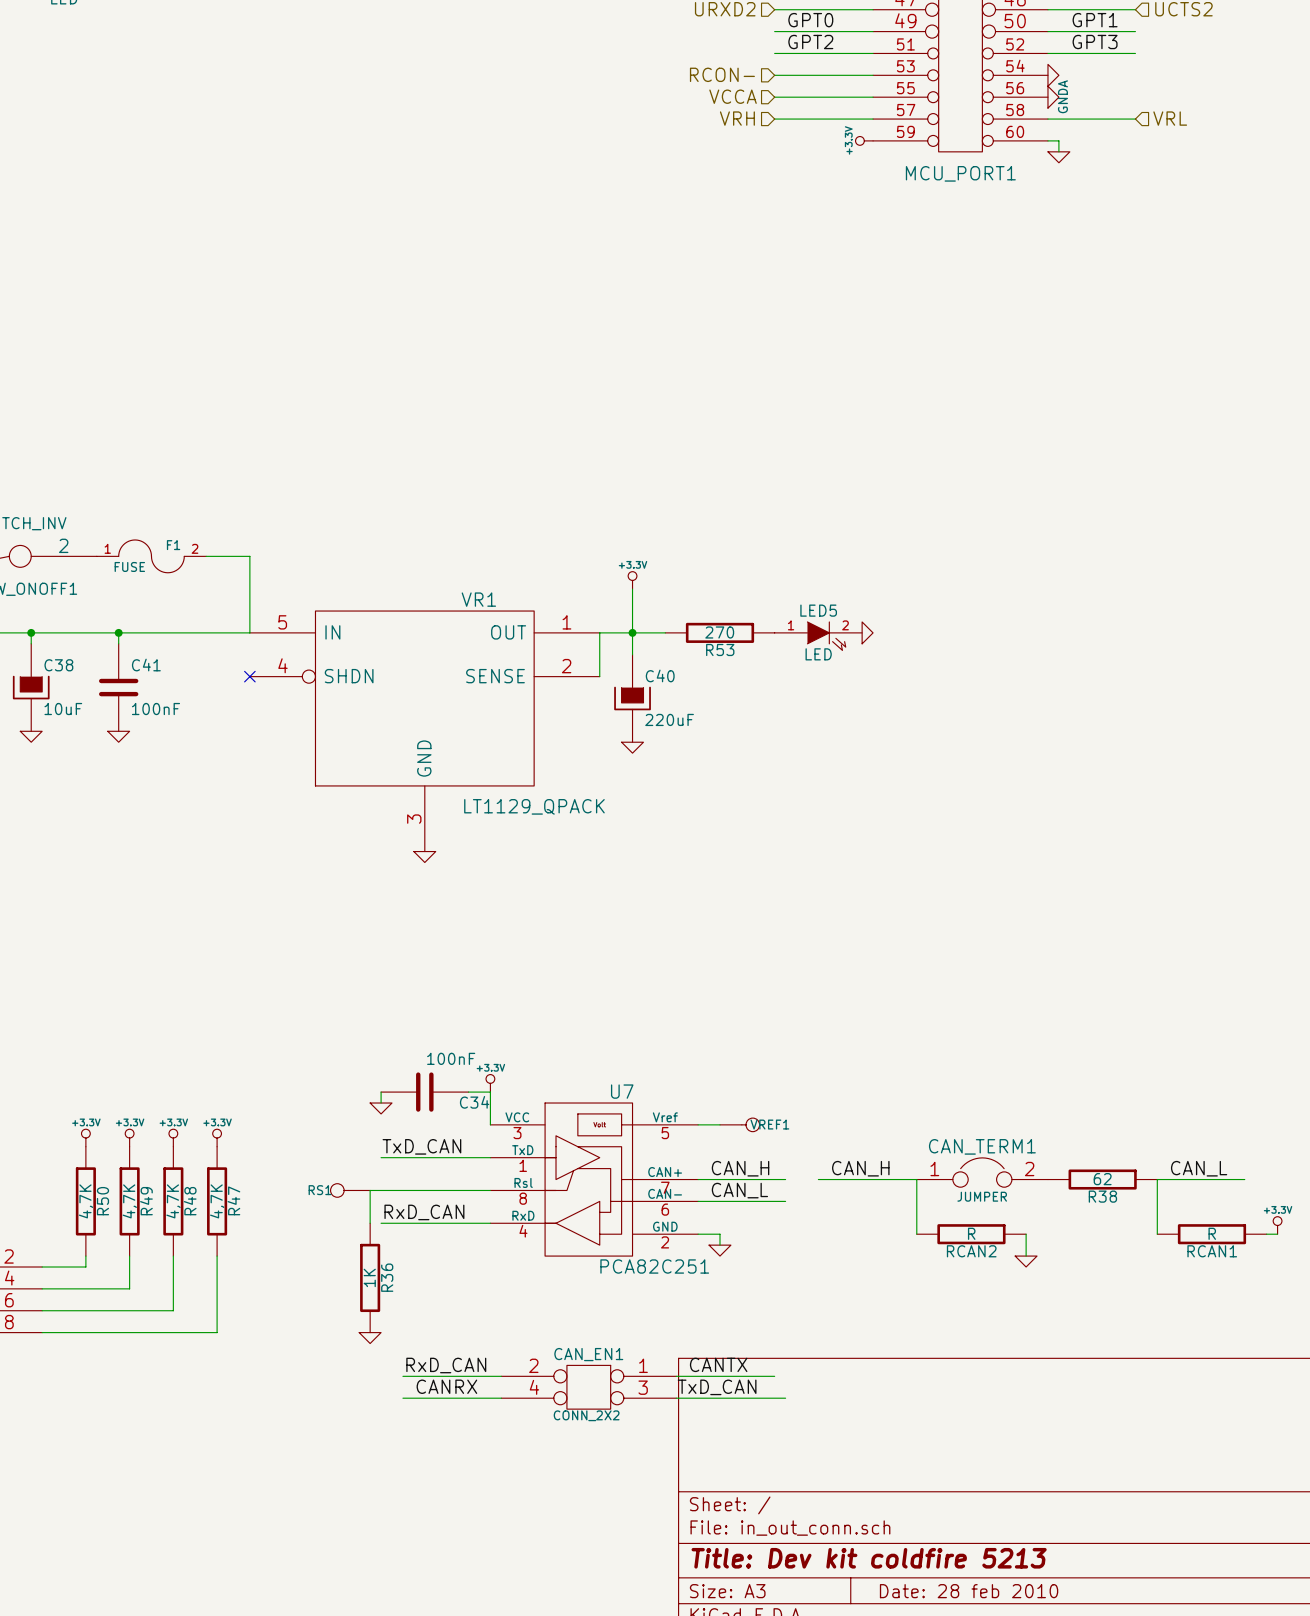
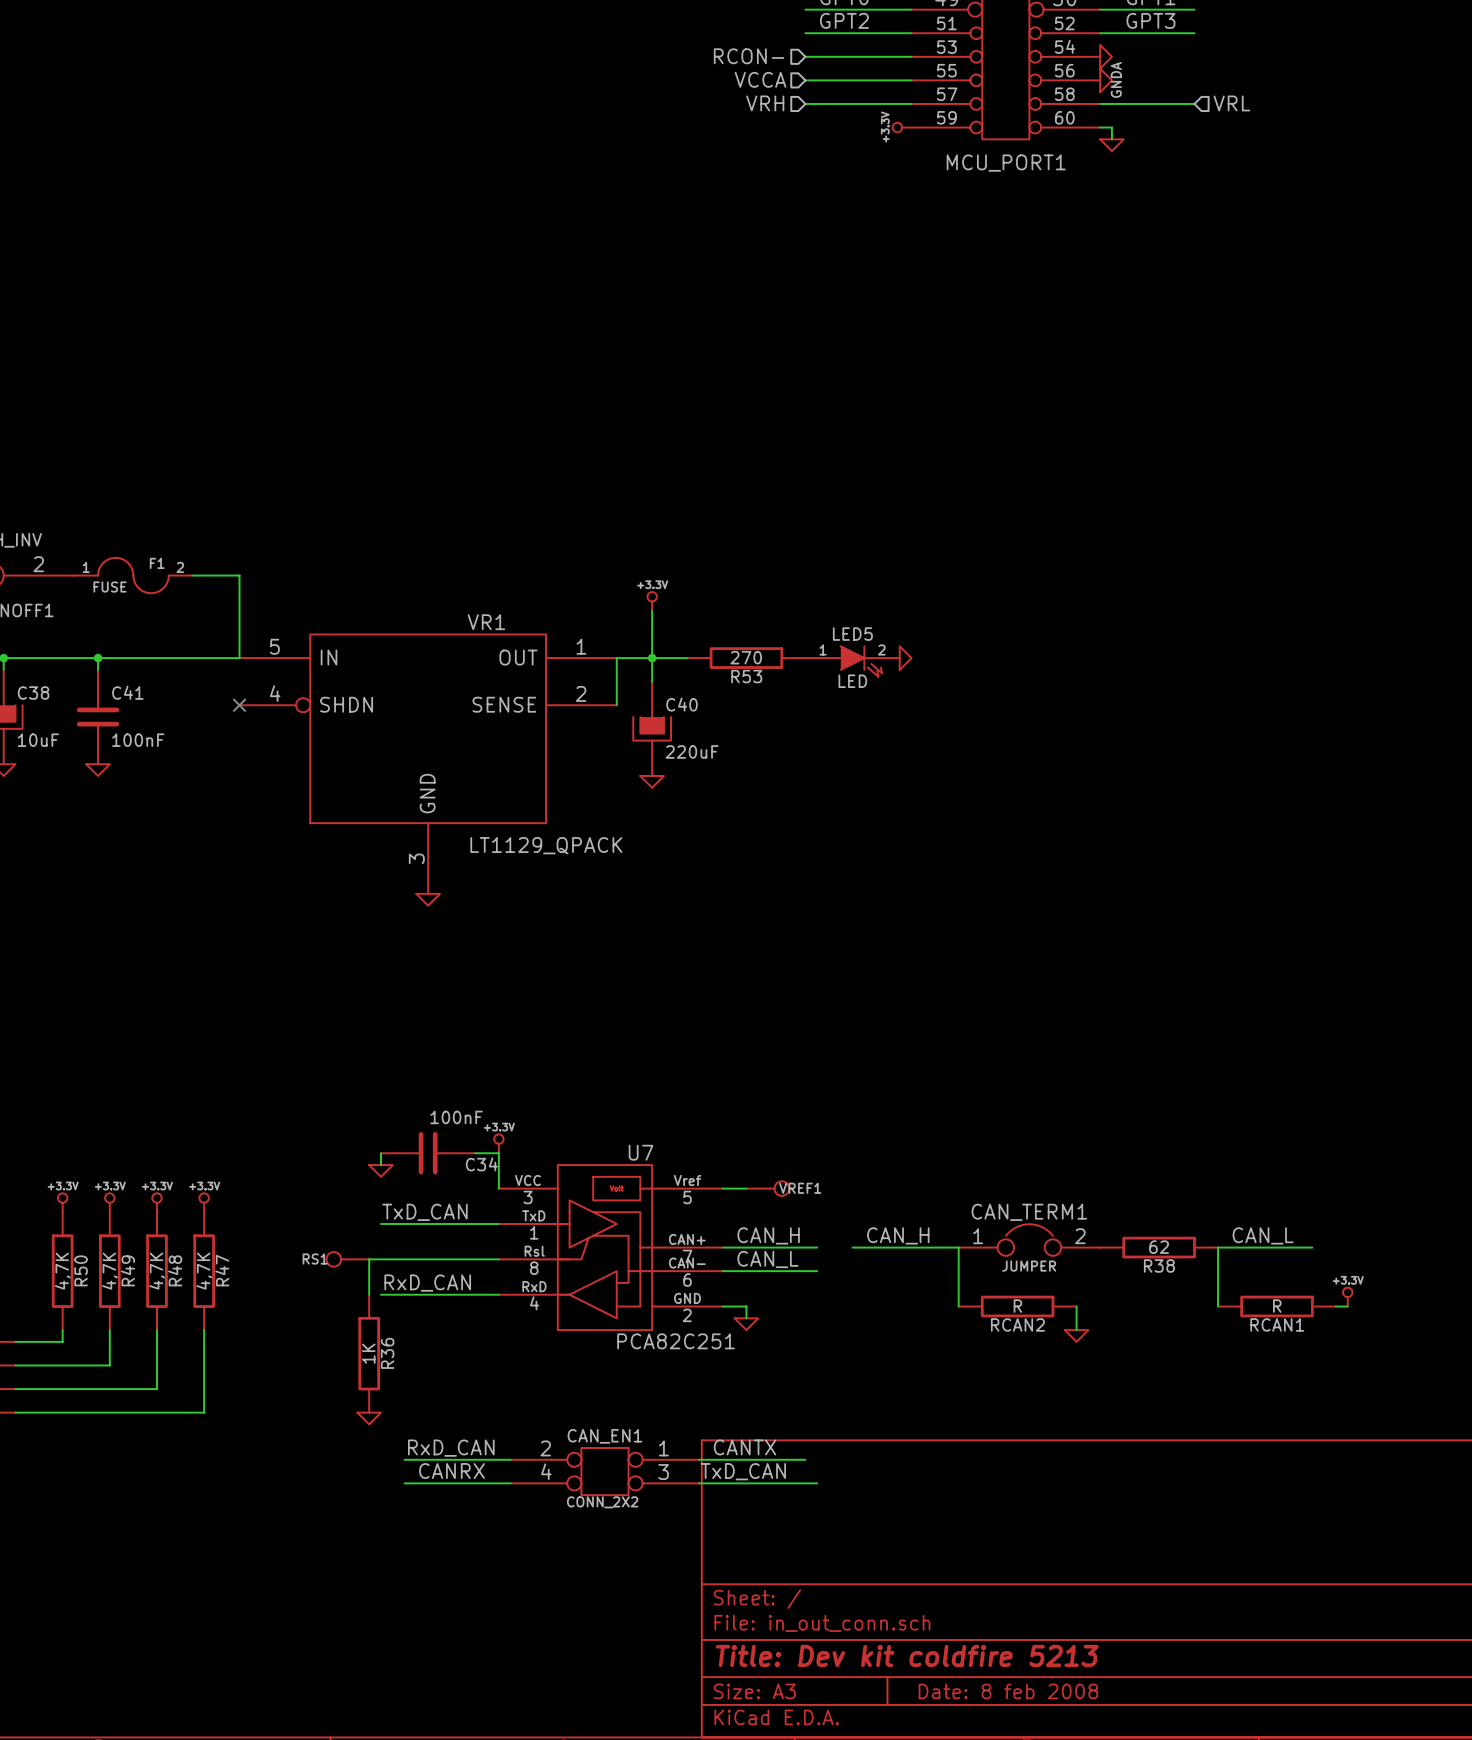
title block: Date: 28 feb 2010 (969, 1591) -> Date: 8 feb 2008 (1008, 1691)

